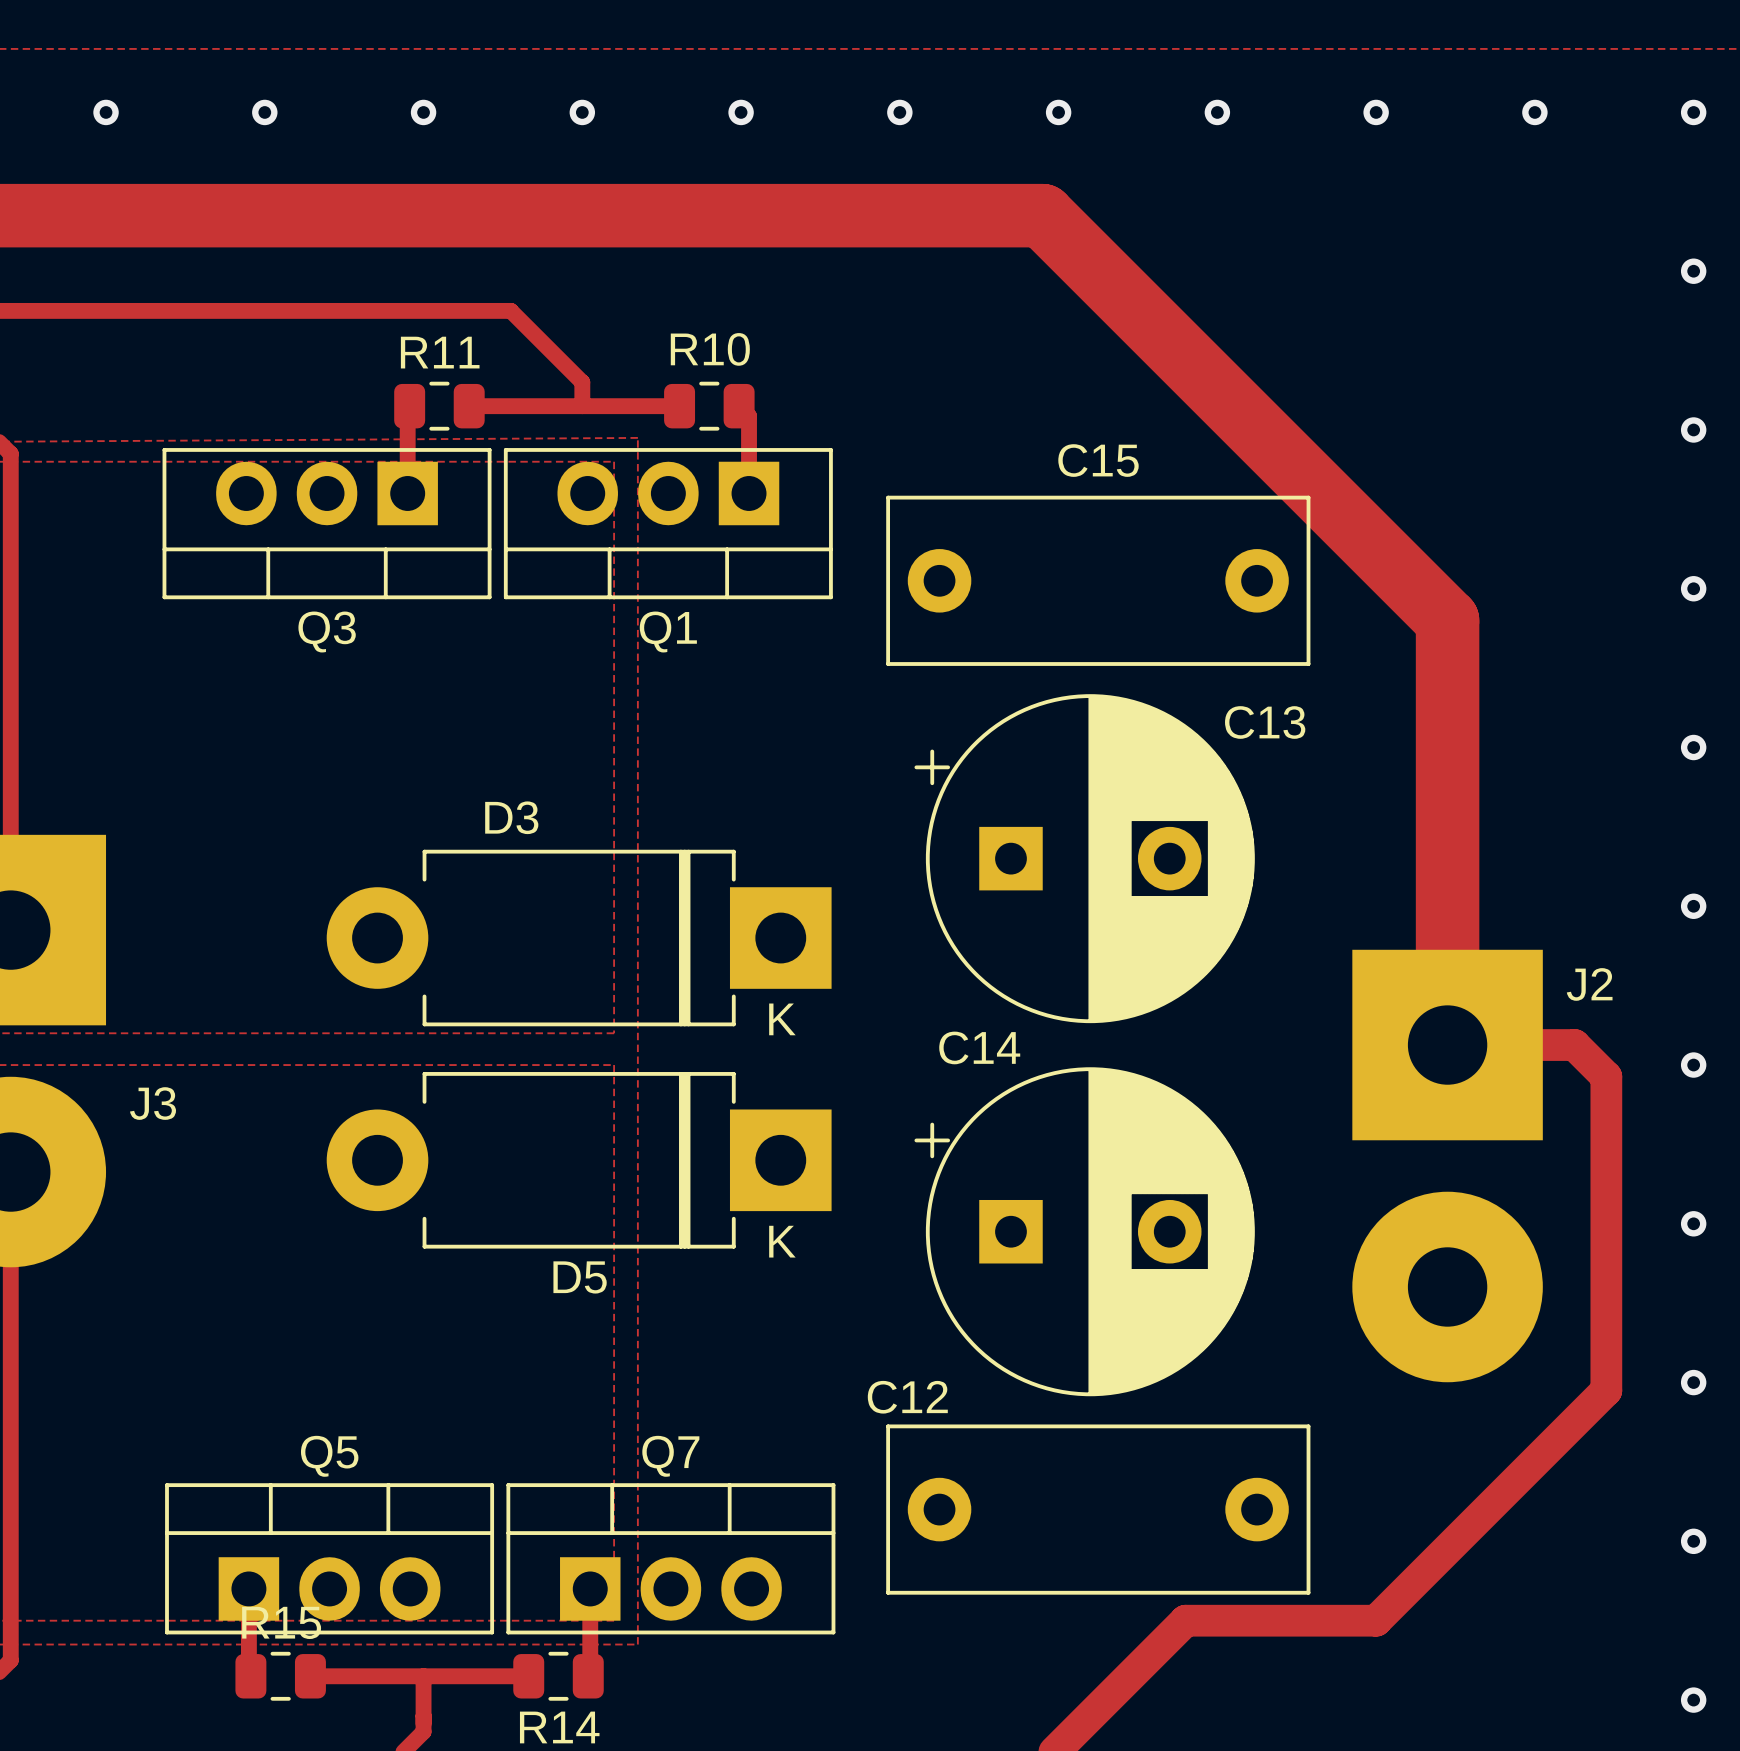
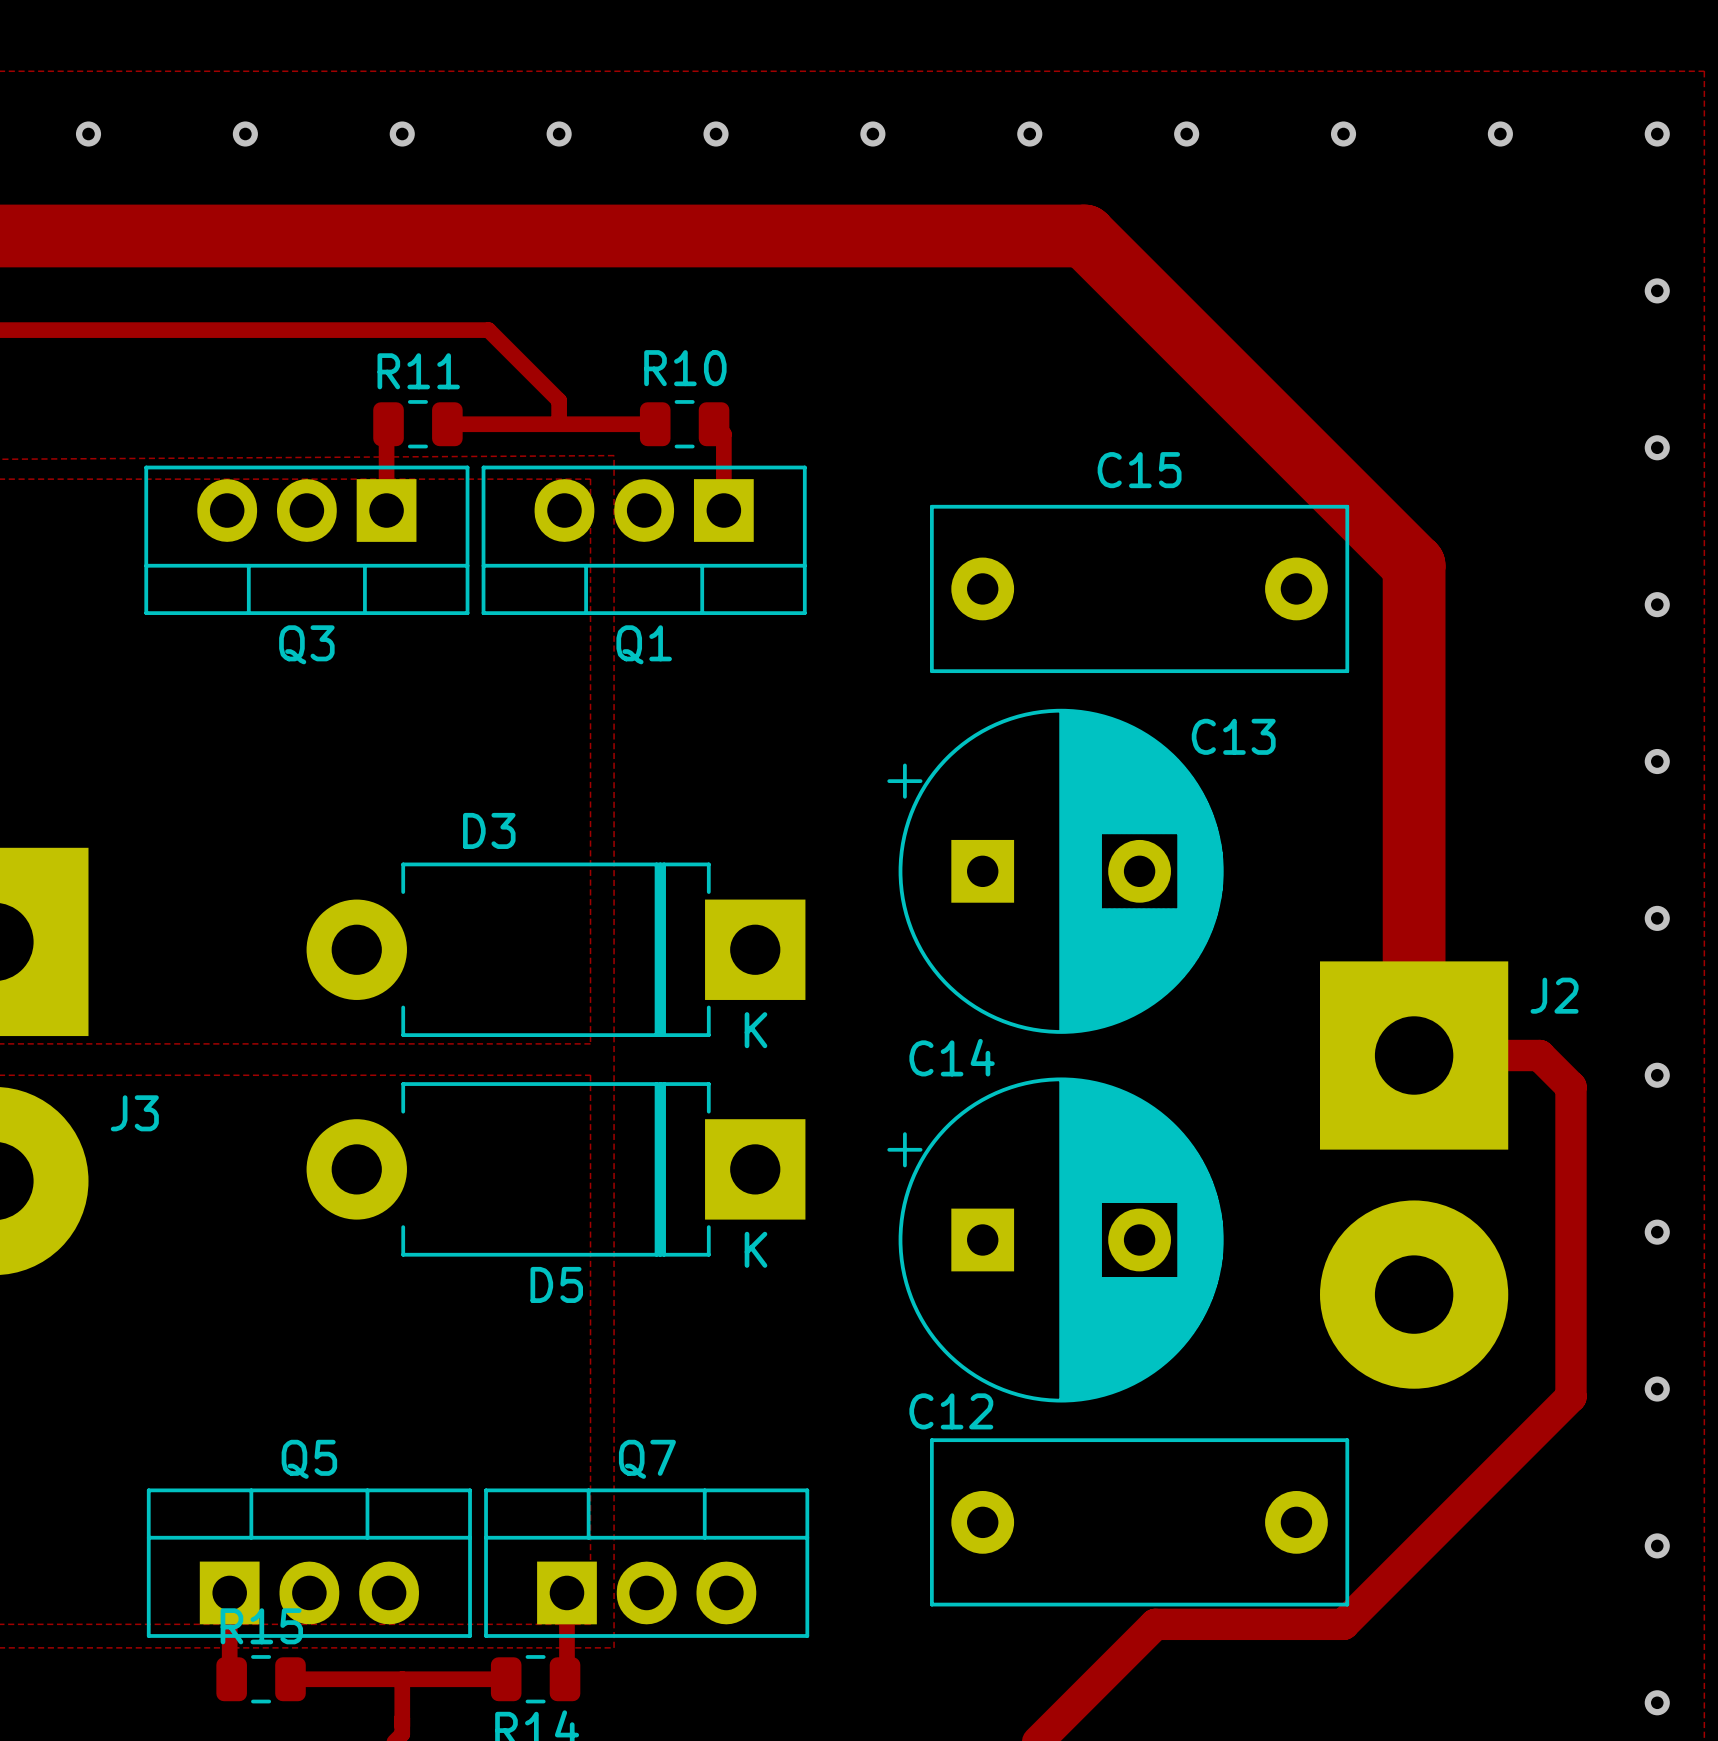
track: (1042, 215) (1447, 620) -> (1014, 235) (1084, 235) (1414, 565) (1414, 636)
C15 position: (1098, 580) -> (1139, 588)
C12 position: (1098, 1509) -> (1139, 1522)

